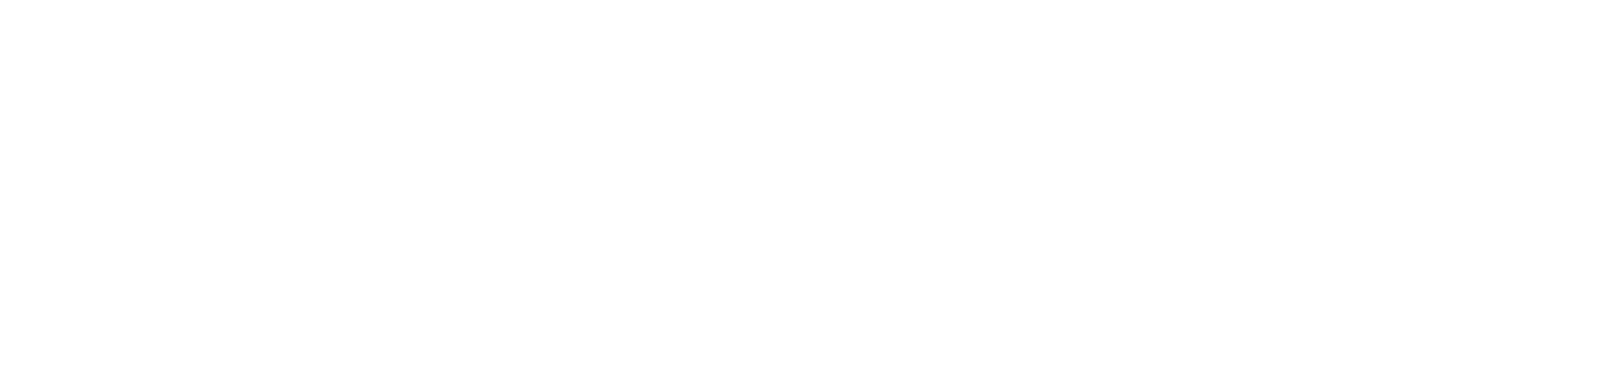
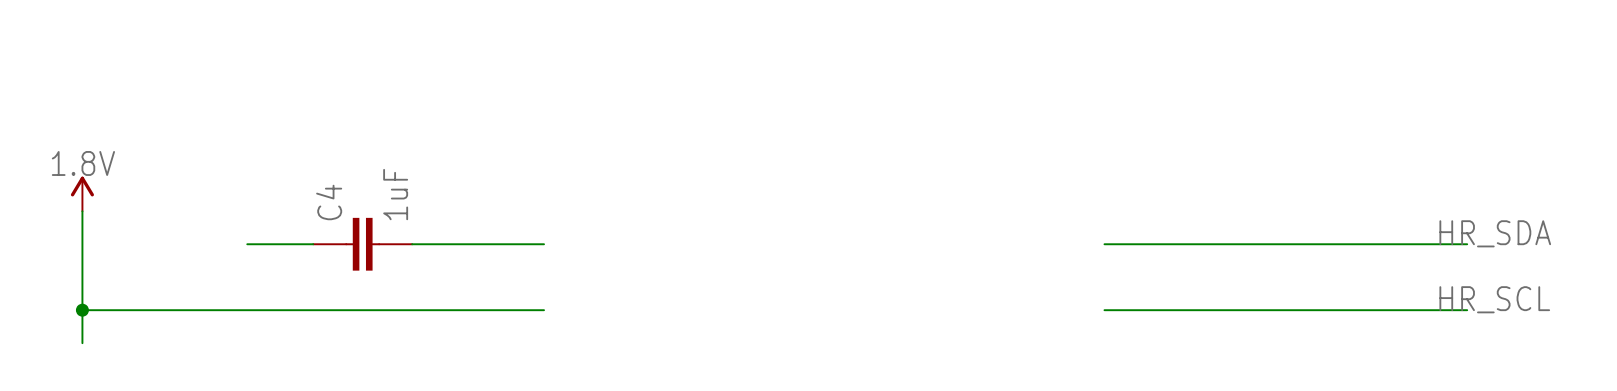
power symbol: none -> 1.8V (82, 193)
wire: none -> (82, 211) (82, 343)
label: none -> HR_SDA (1495, 233)
wire: none -> (247, 244) (313, 244)
C4: none -> 1uF (362, 244)
wire: none -> (412, 244) (544, 244)
wire: none -> (1104, 244) (1467, 244)
label: none -> HR_SCL (1494, 299)
wire: none -> (82, 310) (544, 310)
junction: none -> (82, 310)
wire: none -> (1104, 310) (1467, 310)

